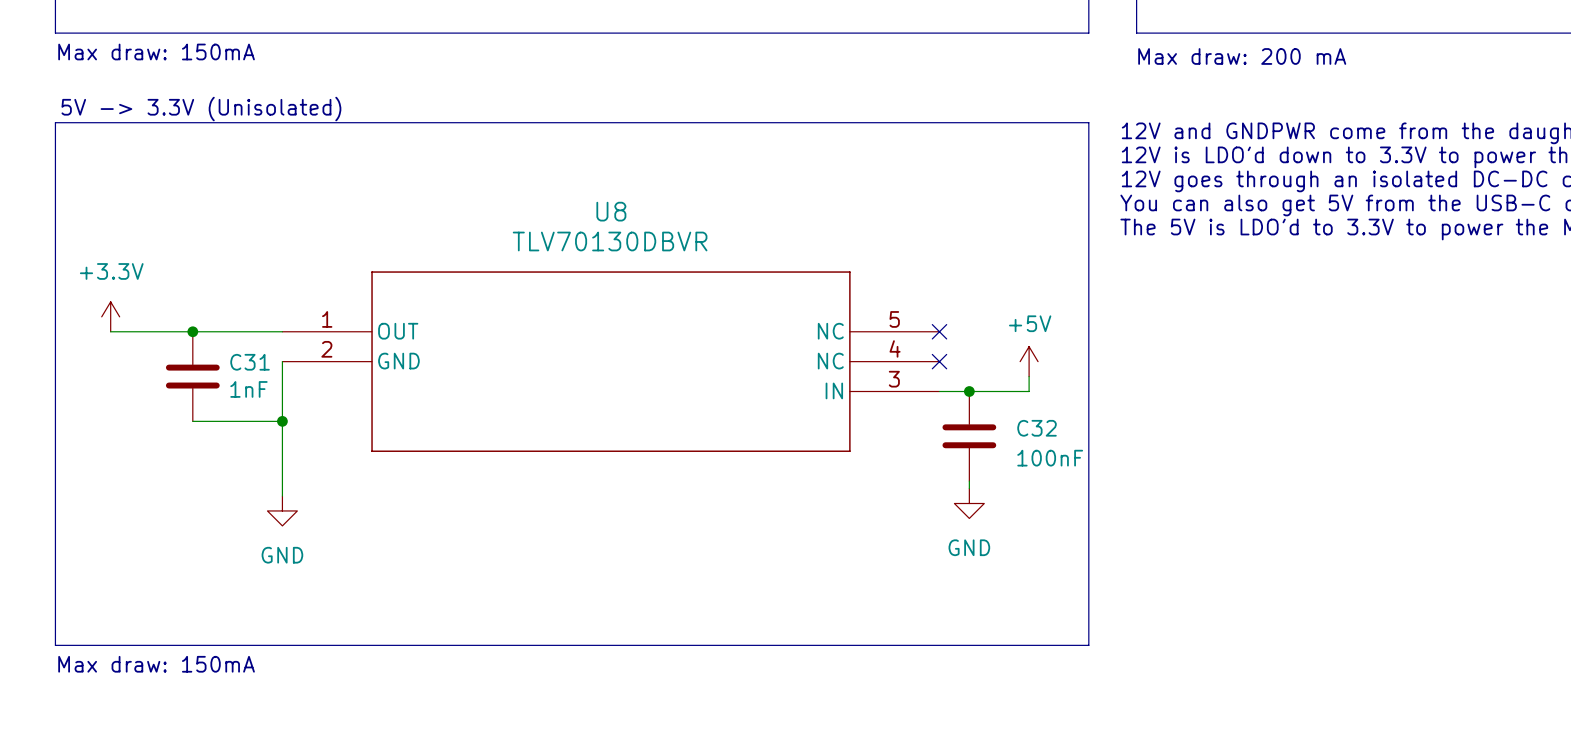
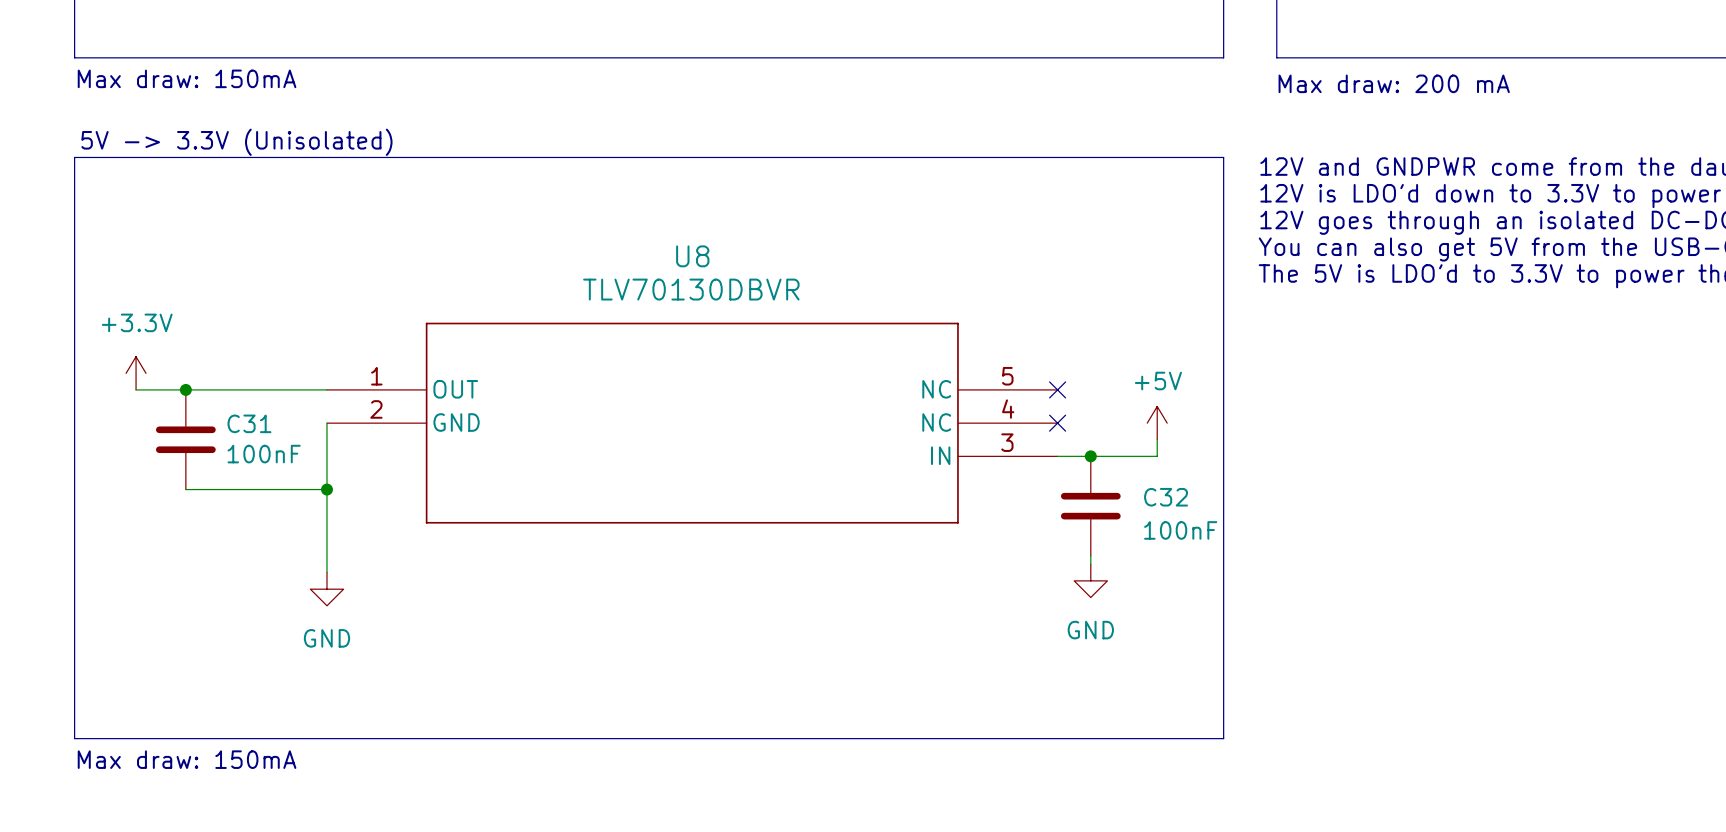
junction position: (192, 331) -> (185, 389)
C31 position: (192, 376) -> (185, 439)
C31 value: 1nF (248, 389) -> 100nF (264, 454)
wire: none -> (185, 489) (227, 489)

